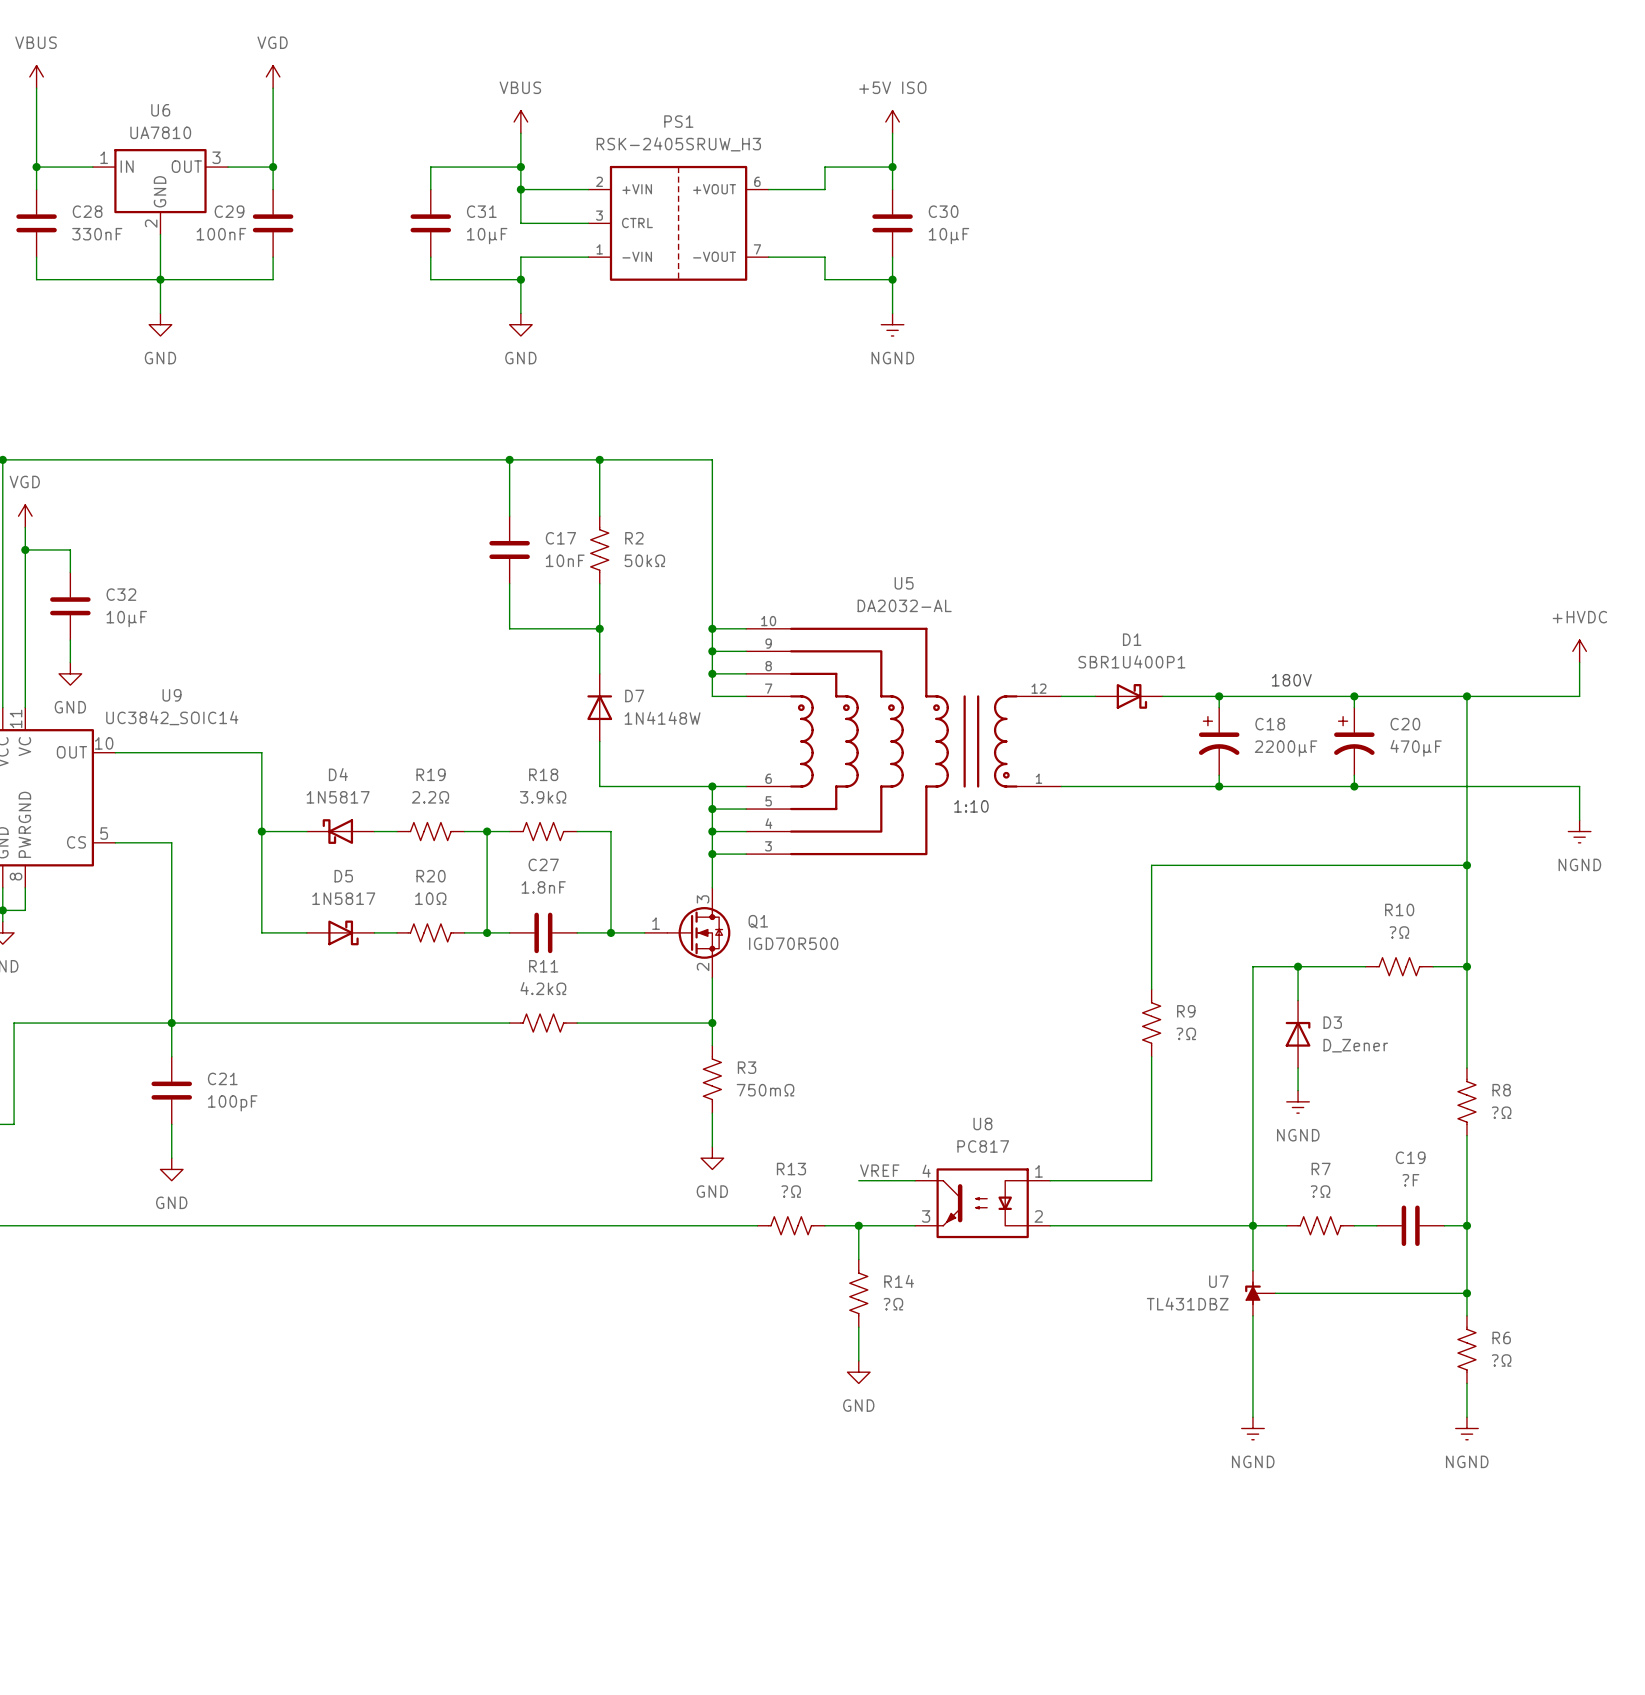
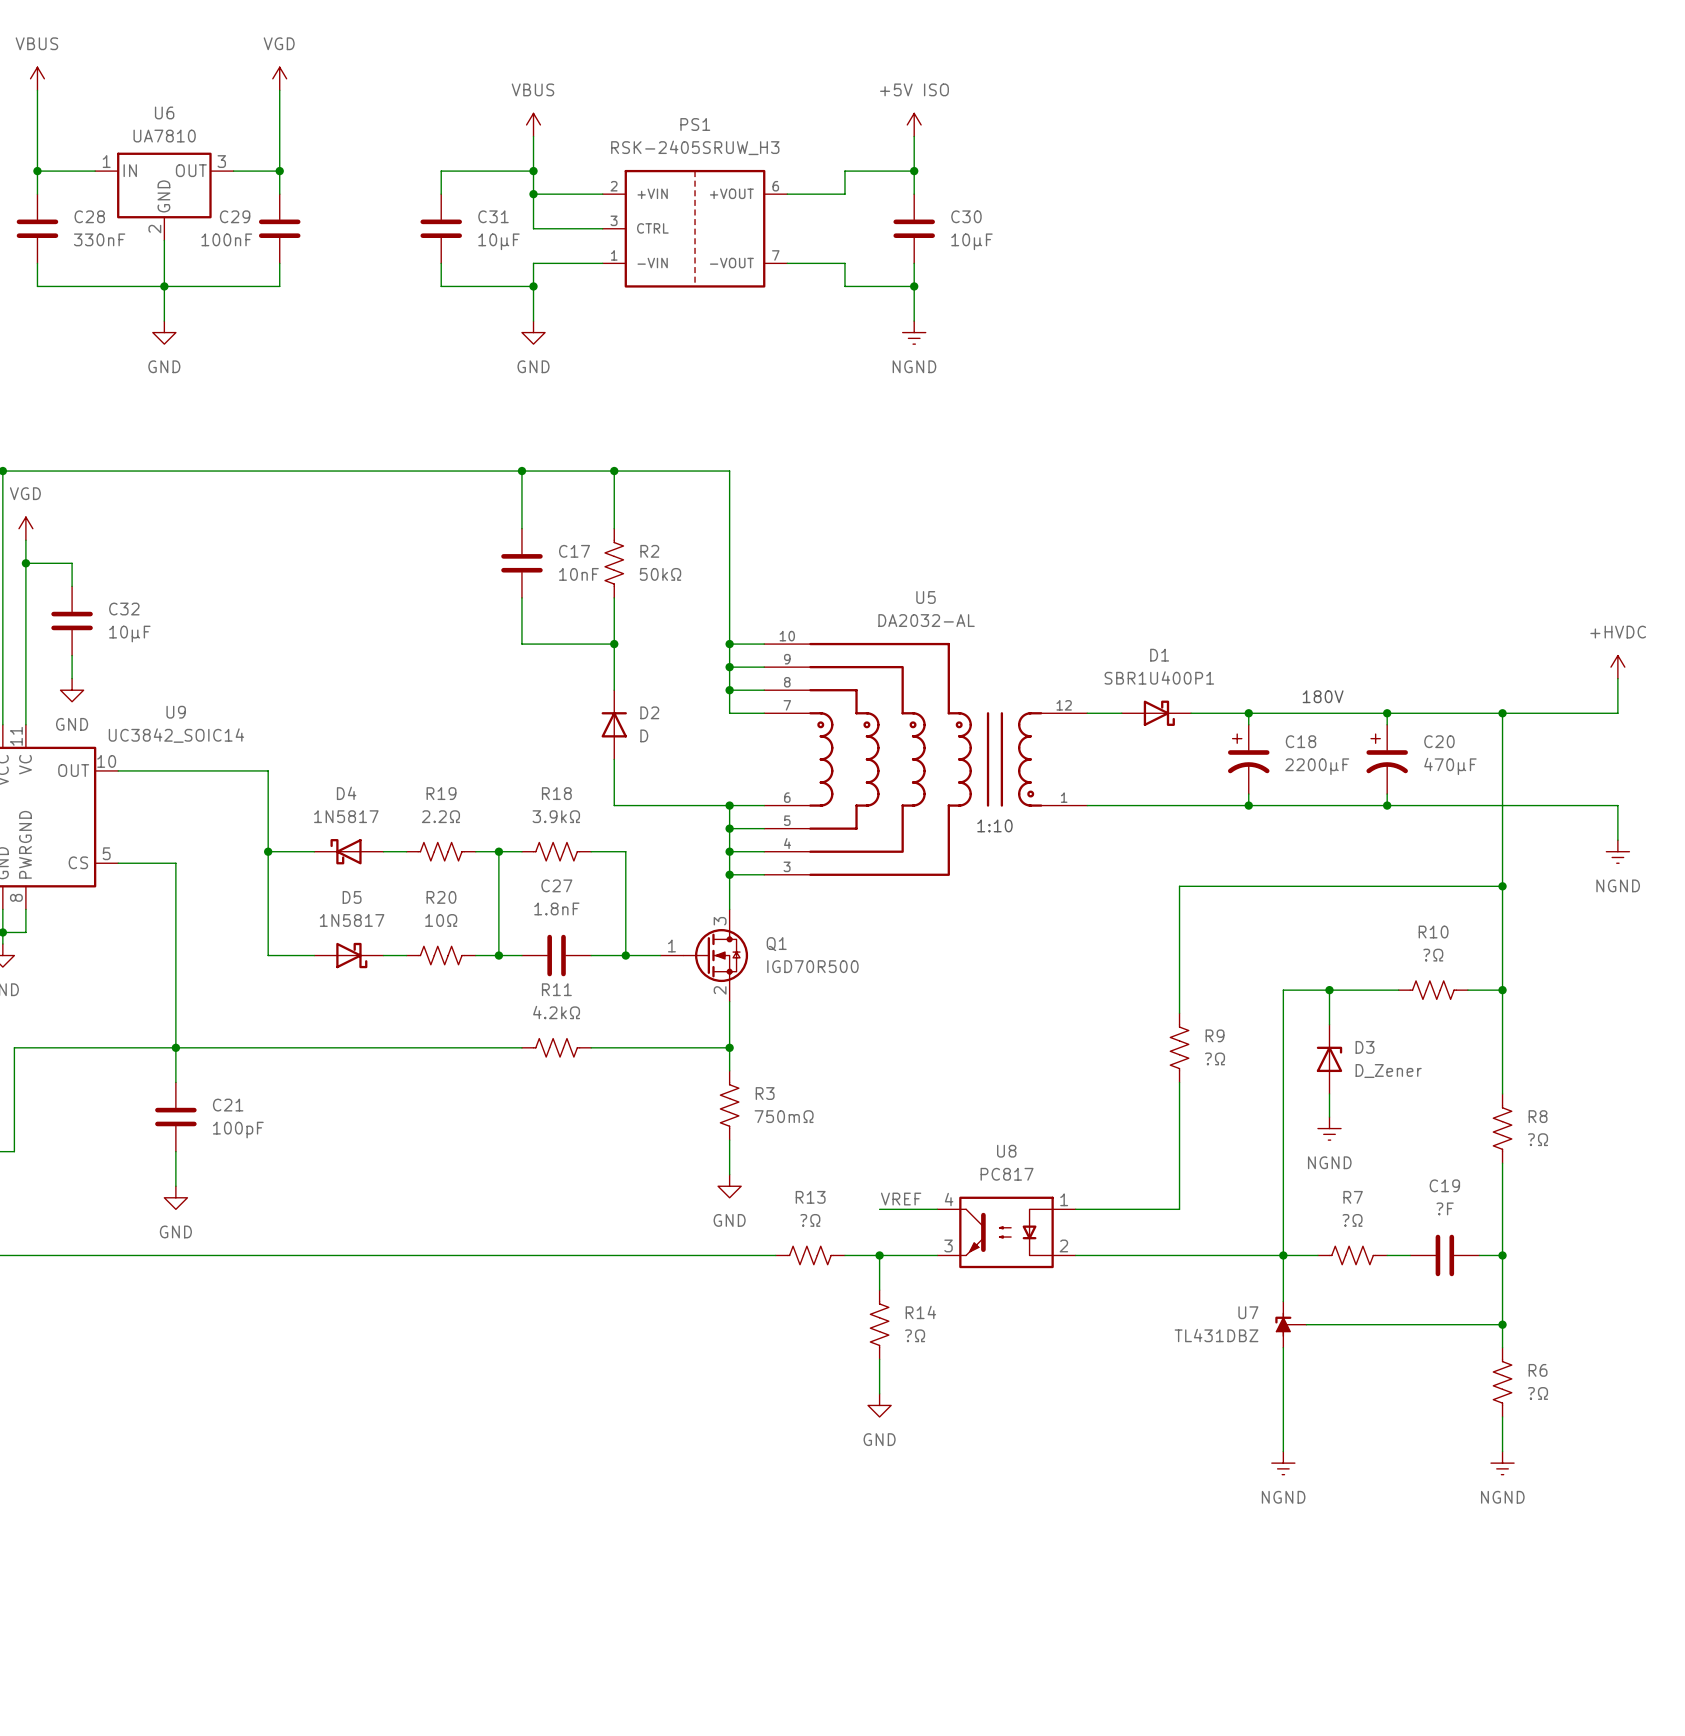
D7 name: D7 (634, 695) -> D2 (649, 712)
D7 value: 1N4148W (662, 718) -> D (644, 735)

